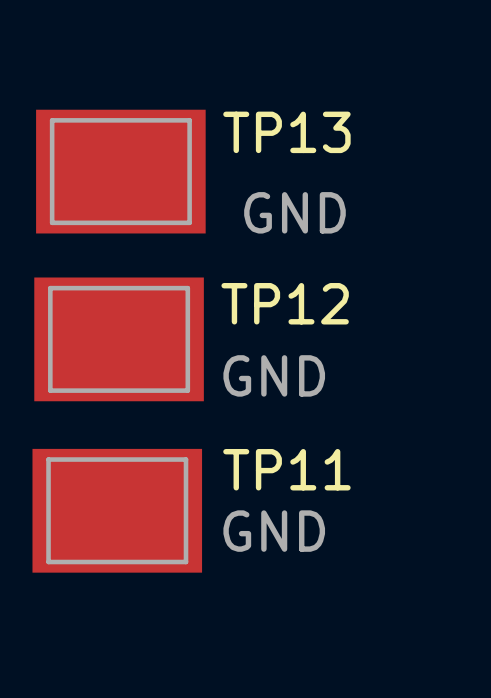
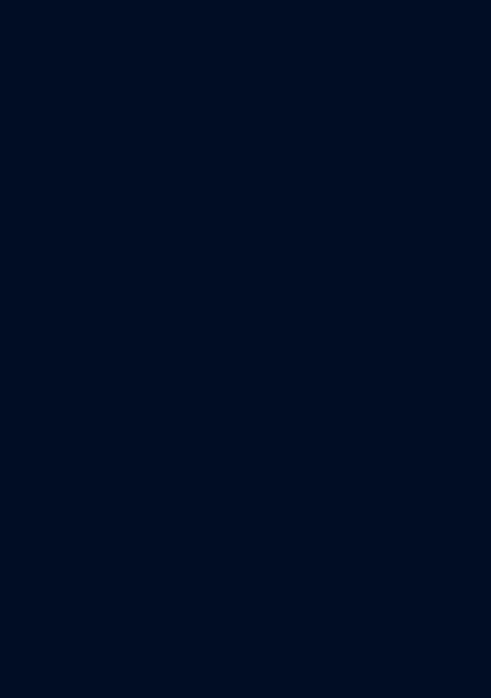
TP13: GND (120, 171) -> none
TP12: GND (119, 339) -> none
TP11: GND (117, 510) -> none

